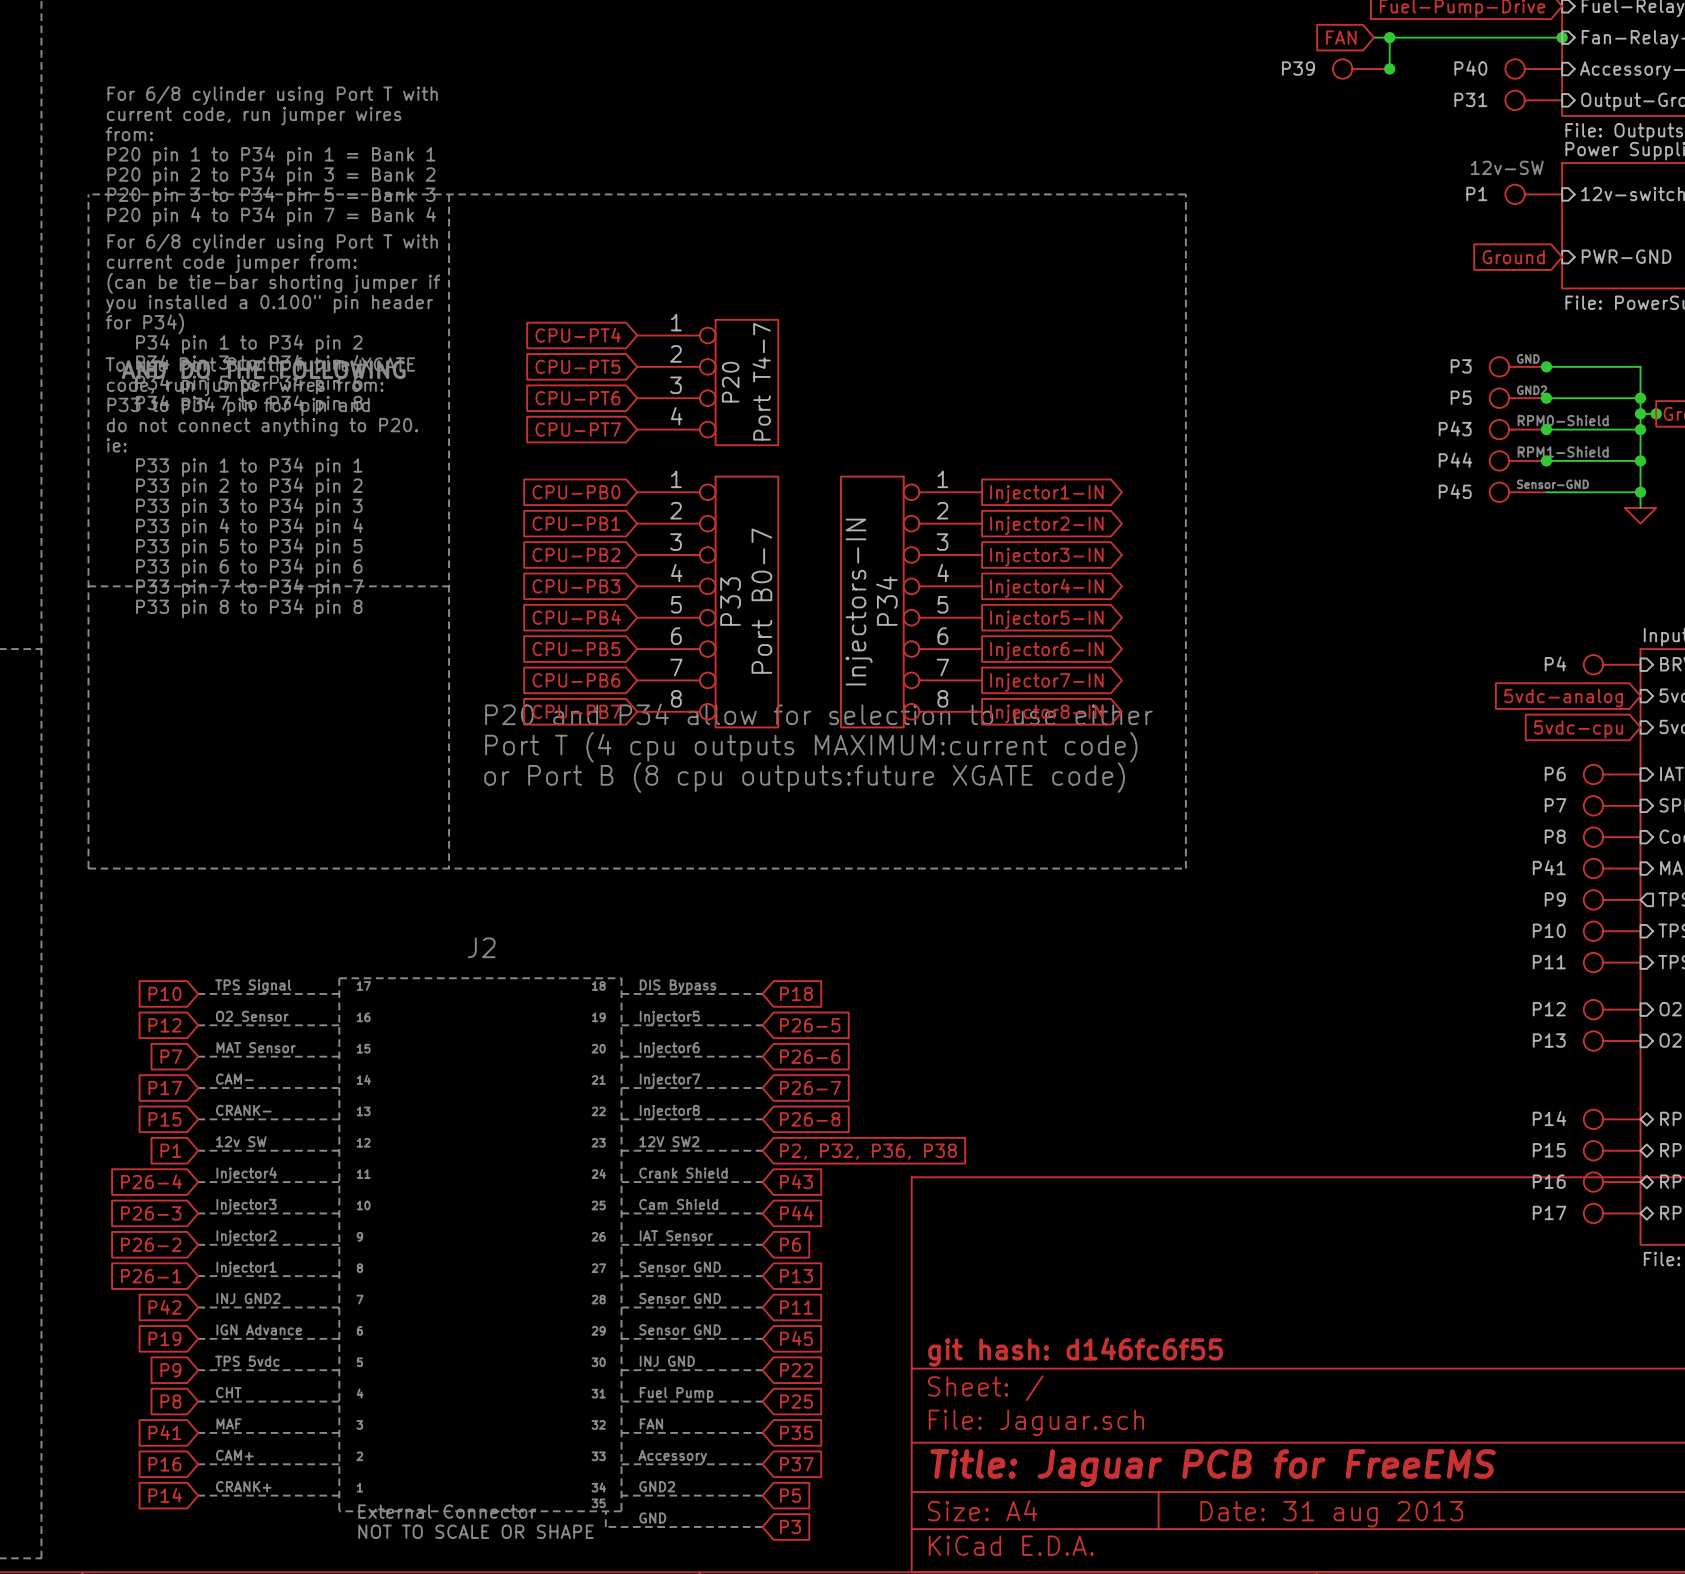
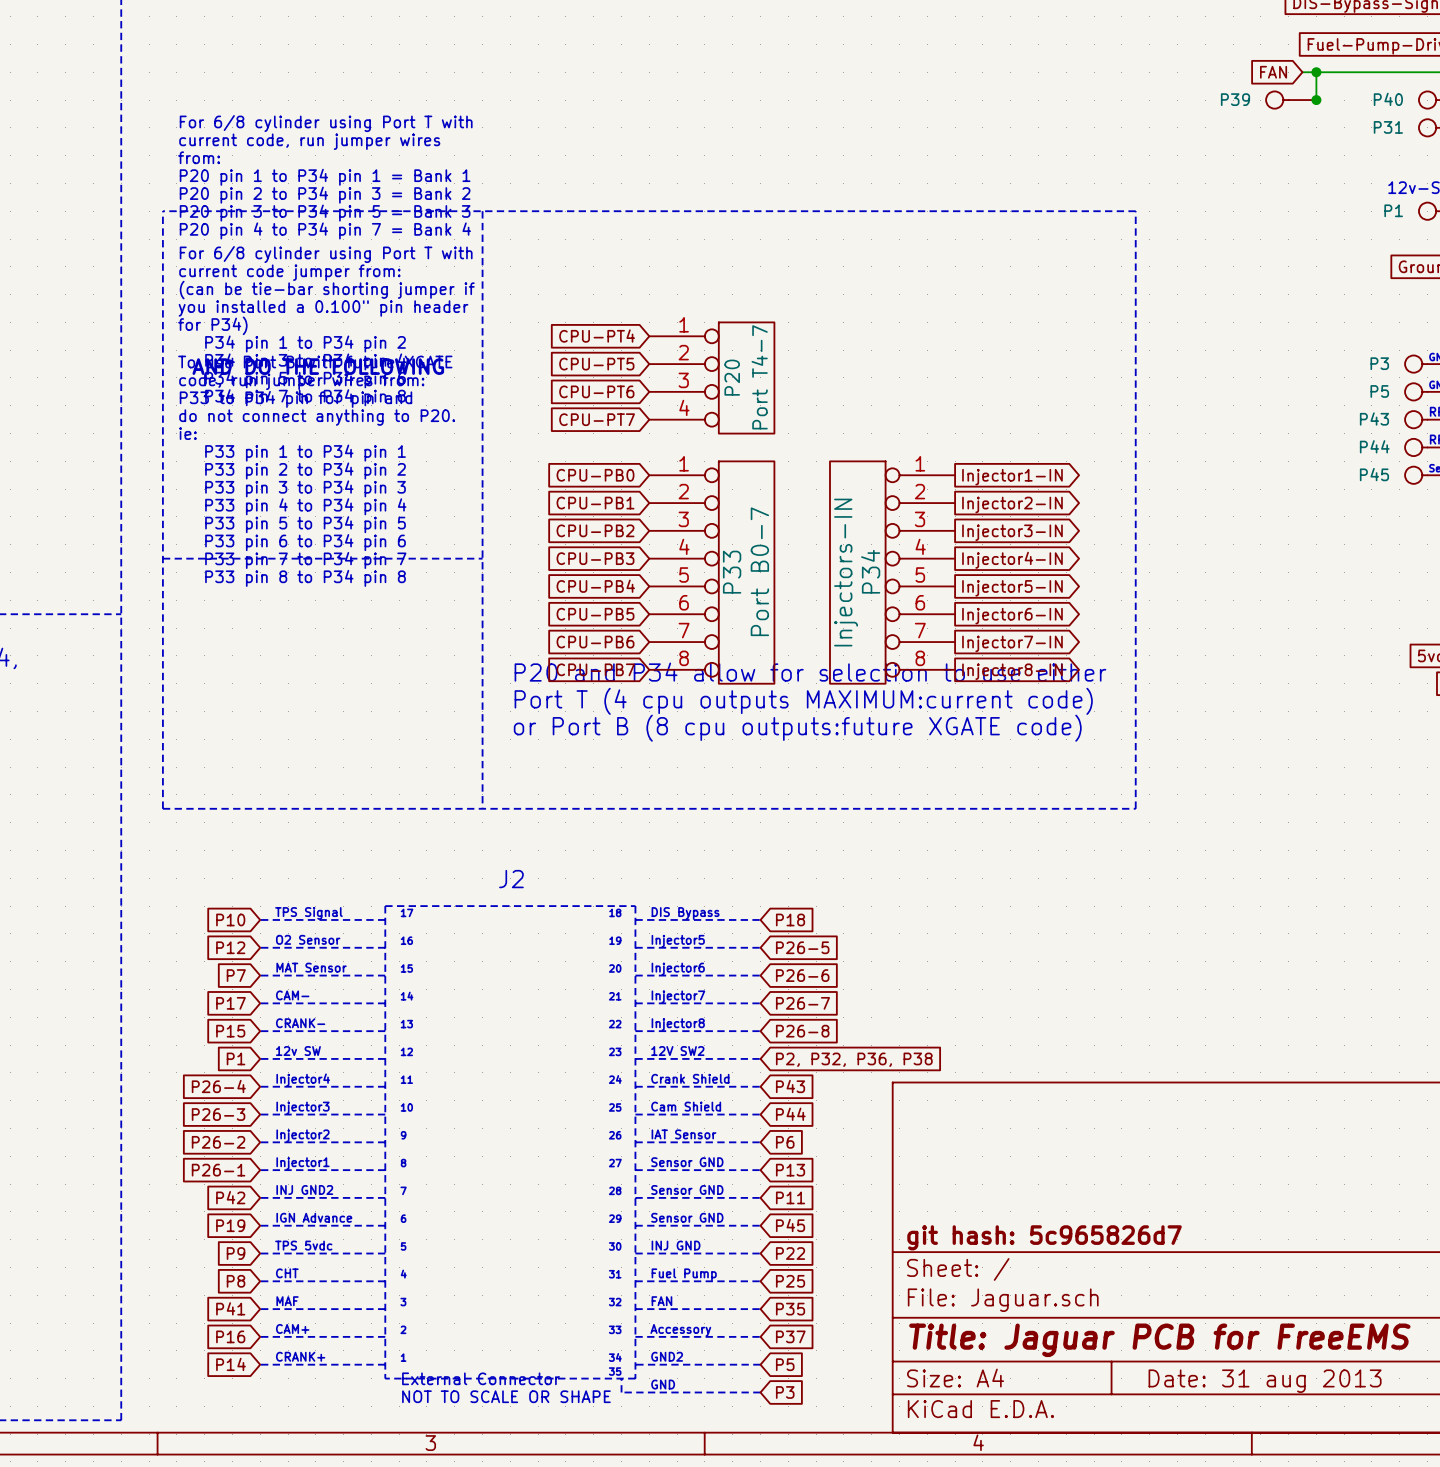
title block: git hash: d146fc6f55 (1075, 1352) -> git hash: 5c965826d7 (1044, 1237)

